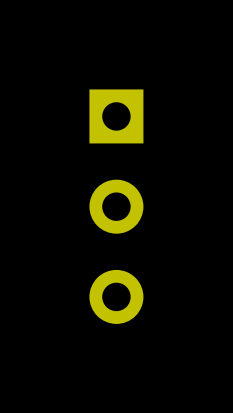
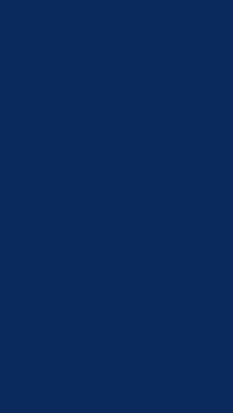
part: (116, 206) -> none

